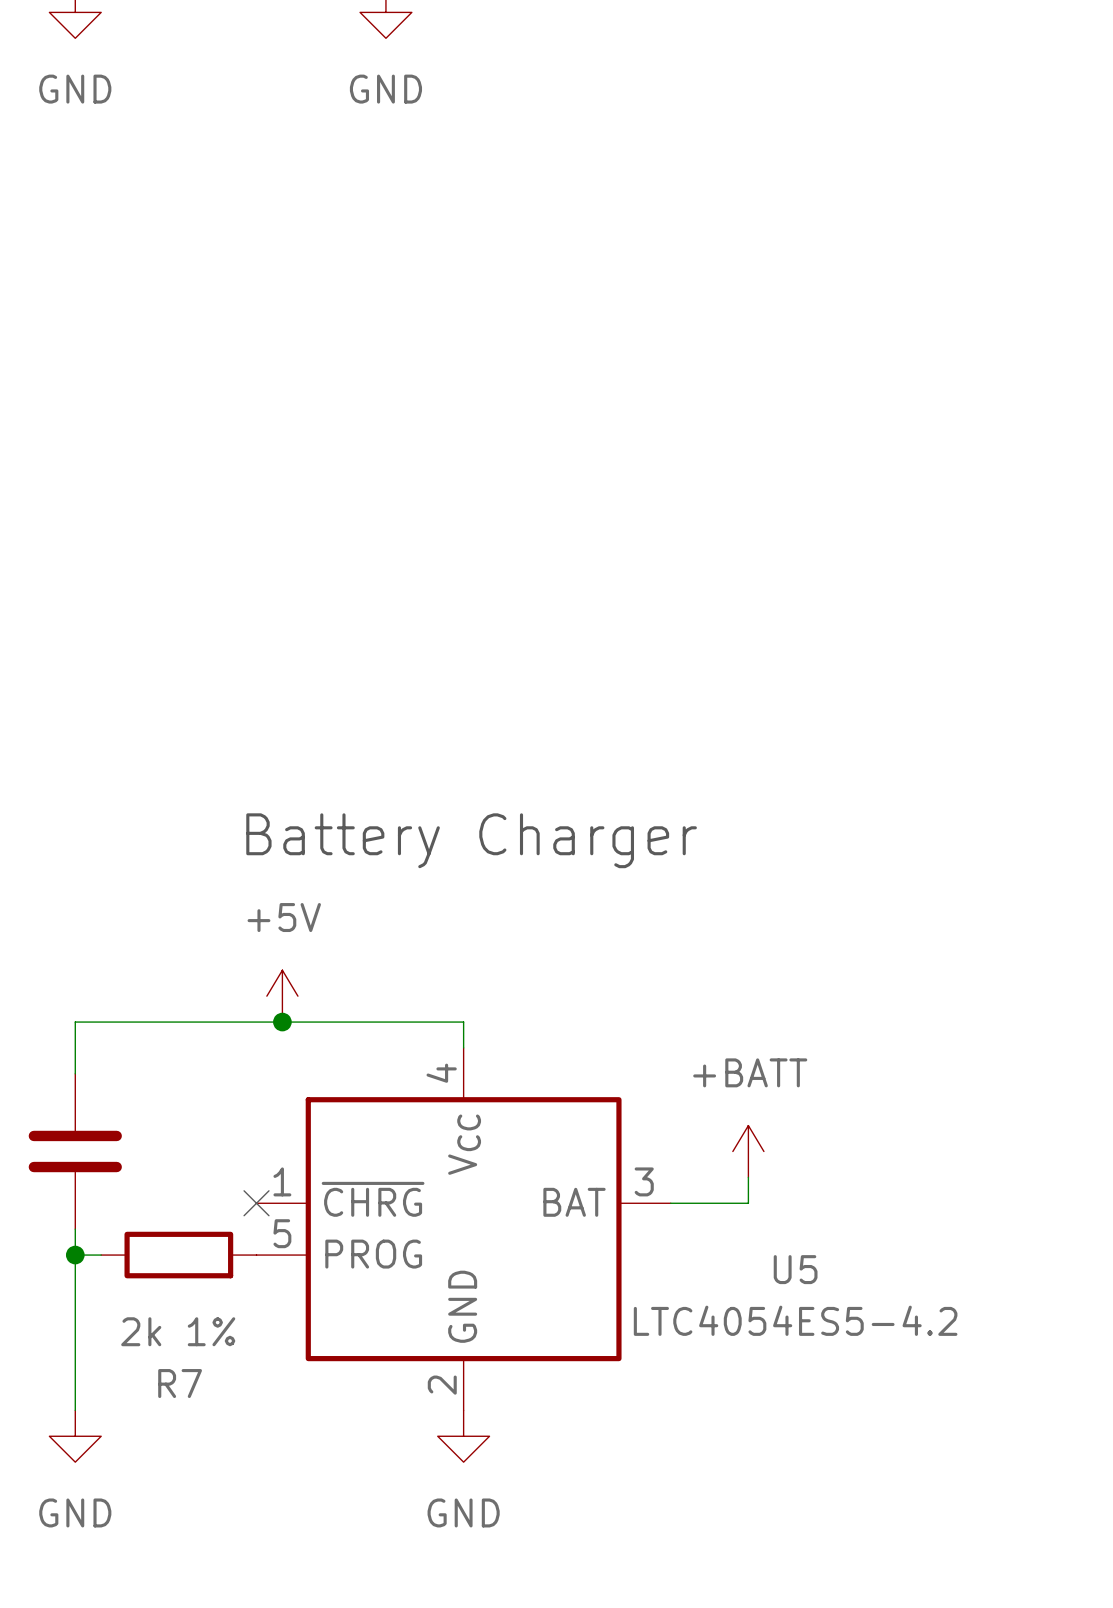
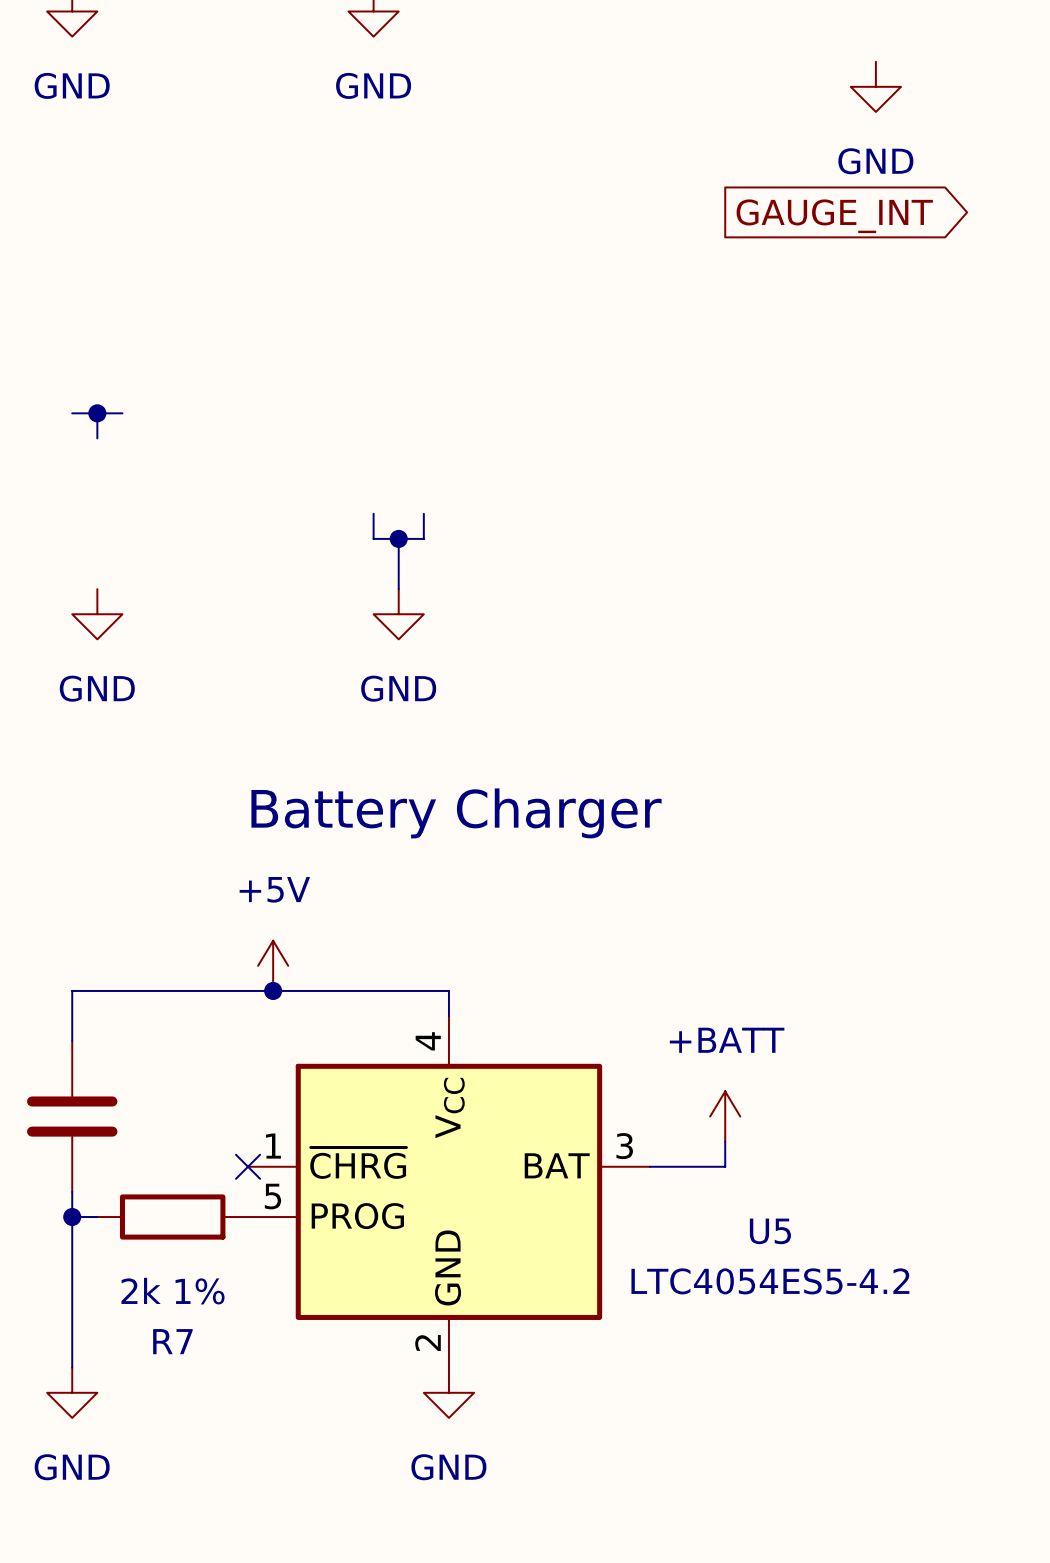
power symbol: none -> GND (875, 86)
global label: none -> GAUGE_INT (834, 216)
wire: none -> (72, 413) (122, 413)
wire: none -> (97, 413) (97, 438)
junction: none -> (97, 413)
wire: none -> (373, 513) (373, 538) (423, 538) (423, 513)
wire: none -> (398, 538) (398, 589)
junction: none -> (398, 538)
power symbol: none -> GND (97, 614)
power symbol: none -> GND (398, 614)

